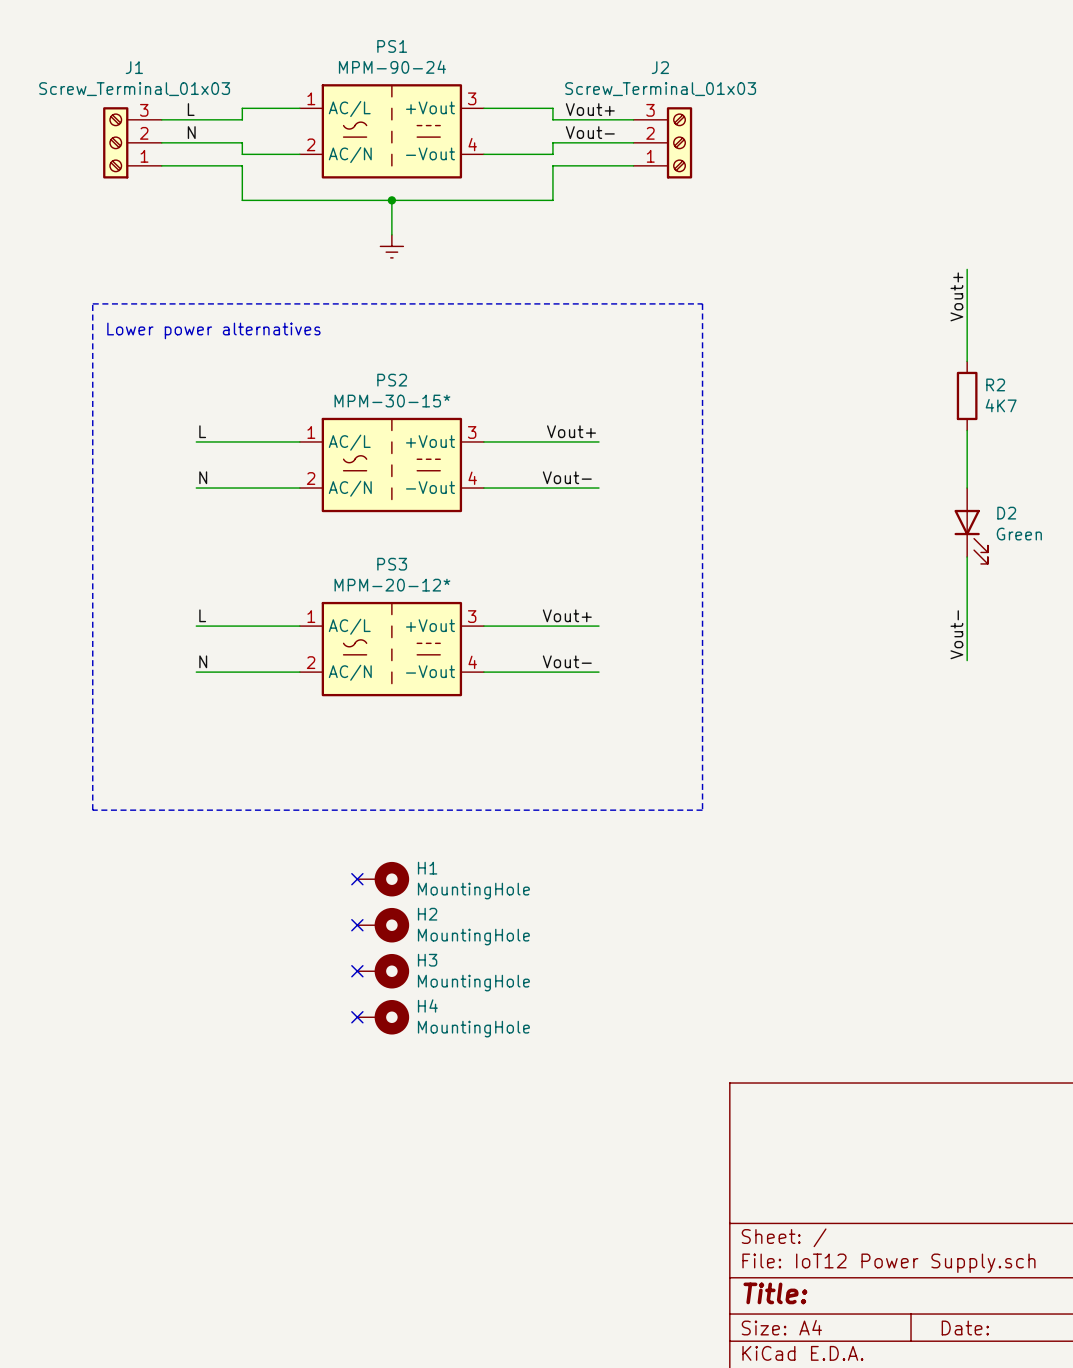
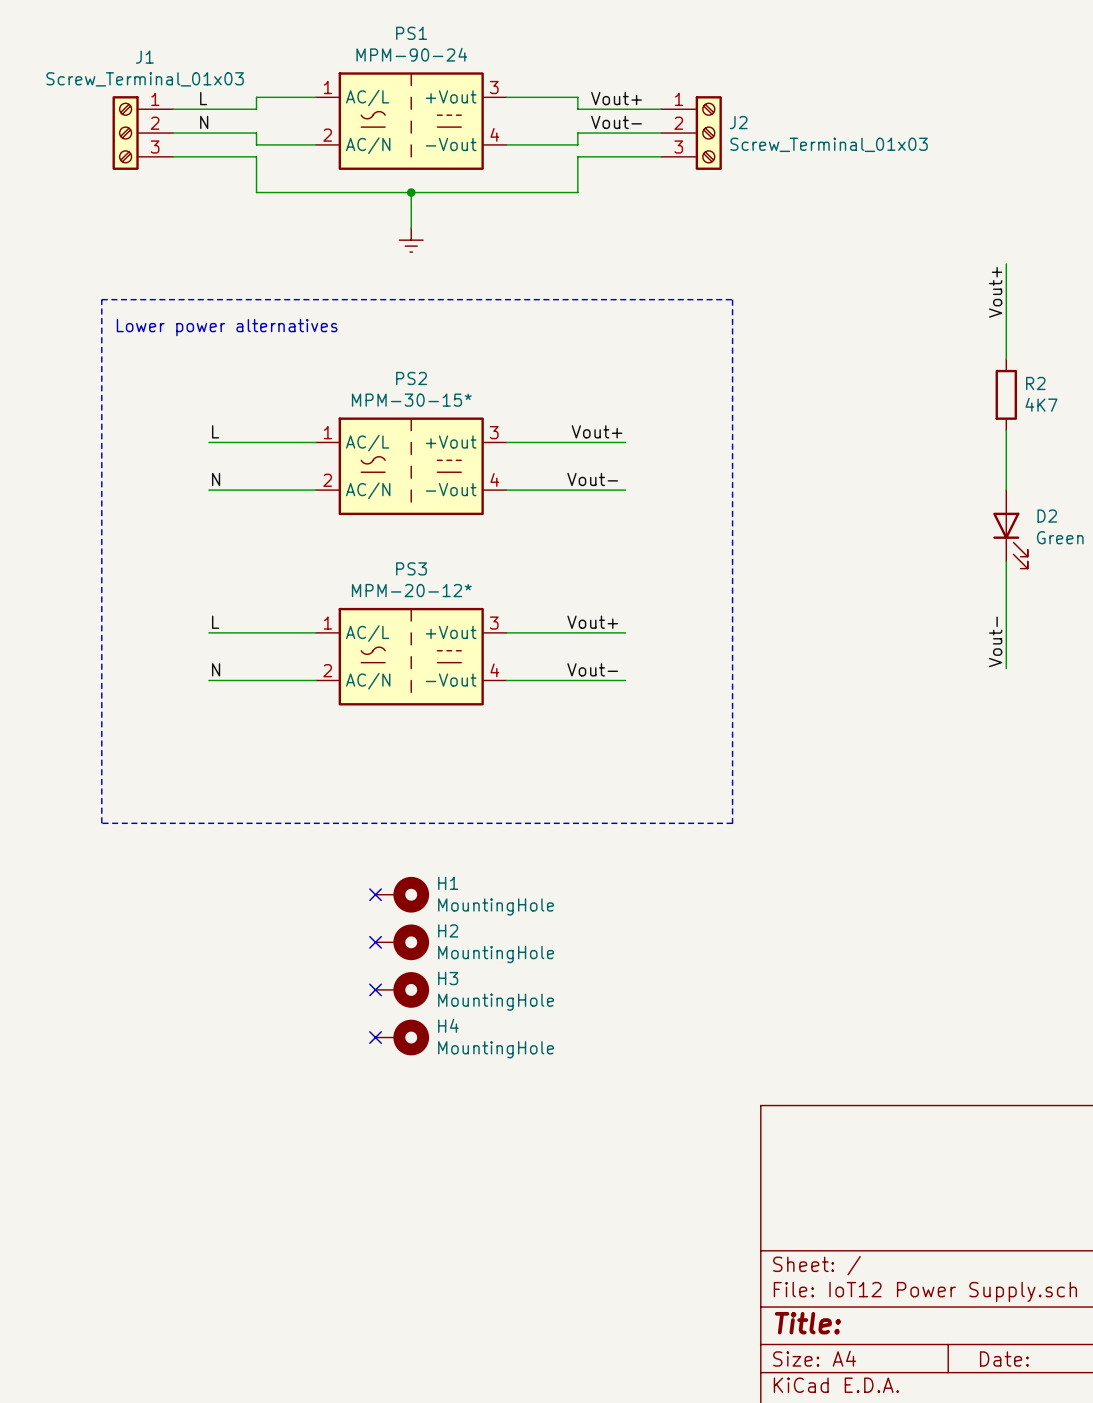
J2 name position: J2 (660, 67) -> J2 (738, 122)
J2 value position: Screw_Terminal_01x03 (660, 89) -> Screw_Terminal_01x03 (829, 144)
J1 flip: as is (115, 142) -> up-down (125, 133)
J2 flip: as is (679, 142) -> up-down (708, 133)

